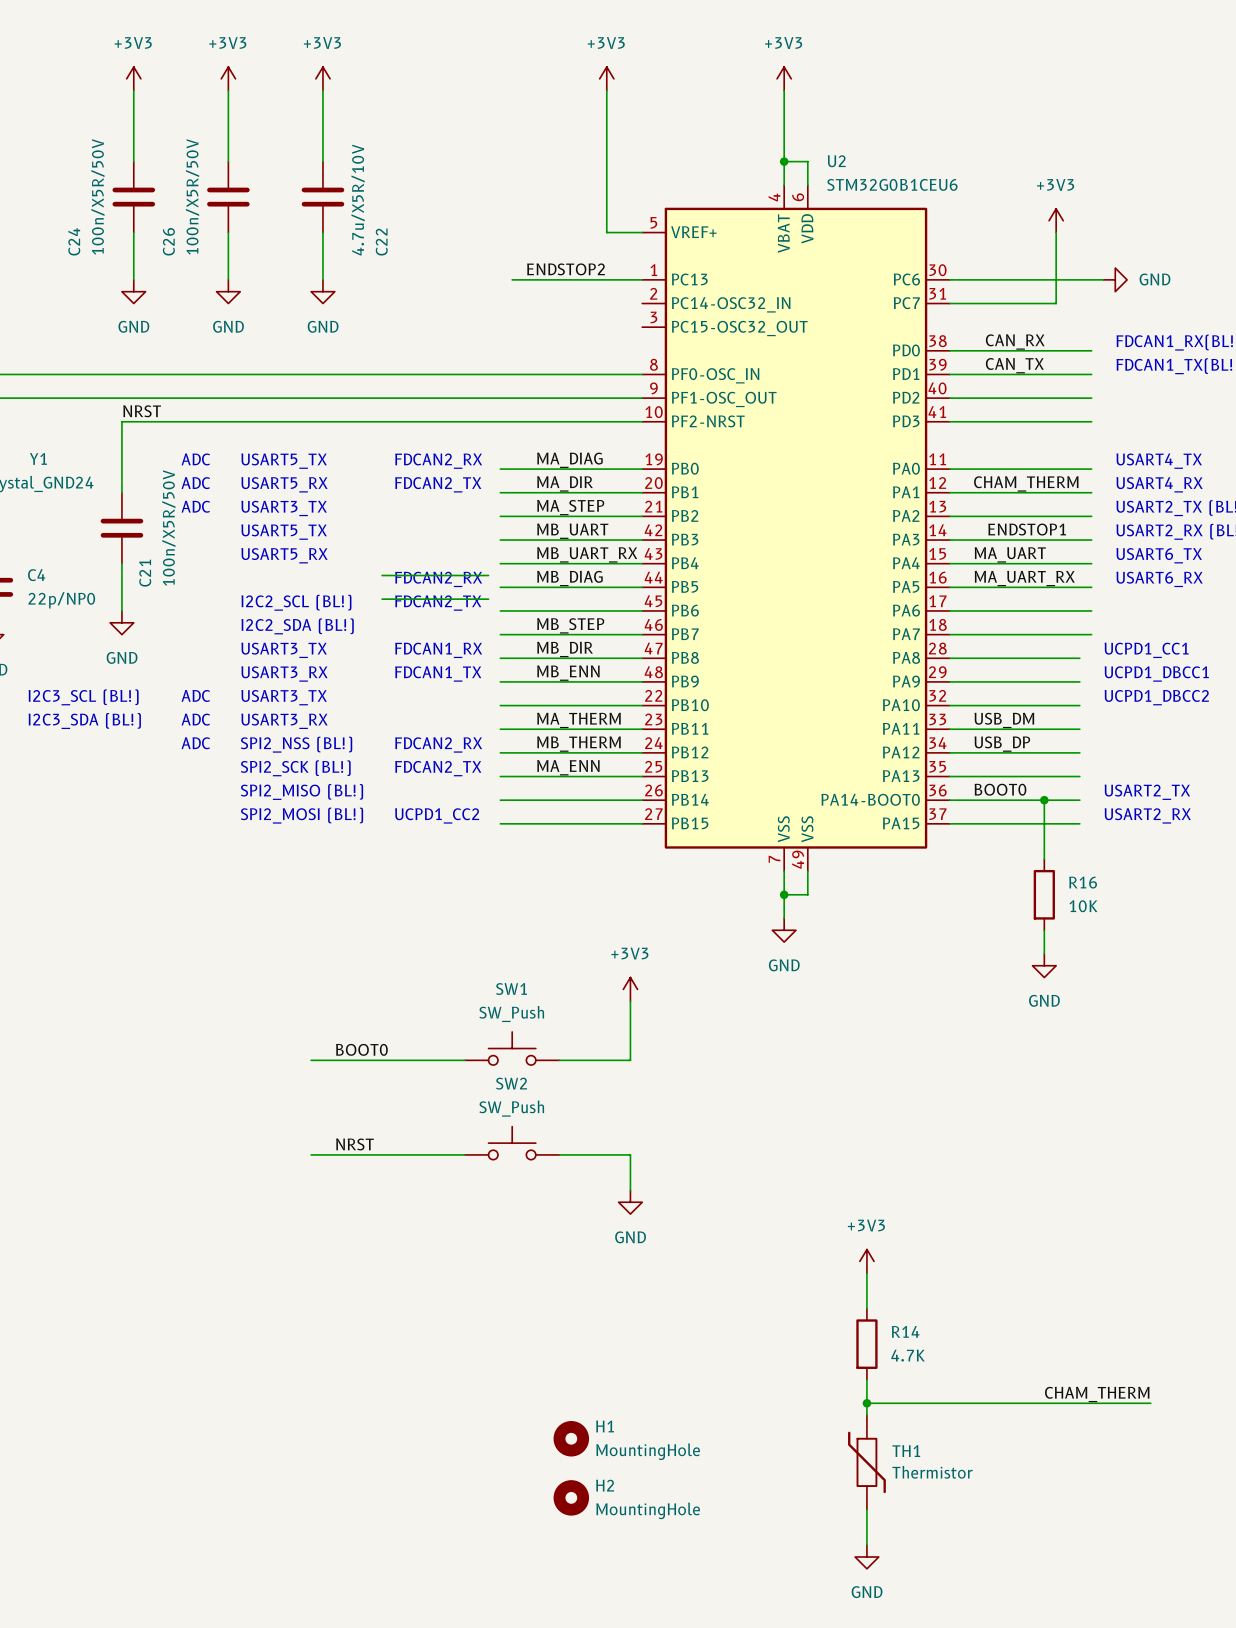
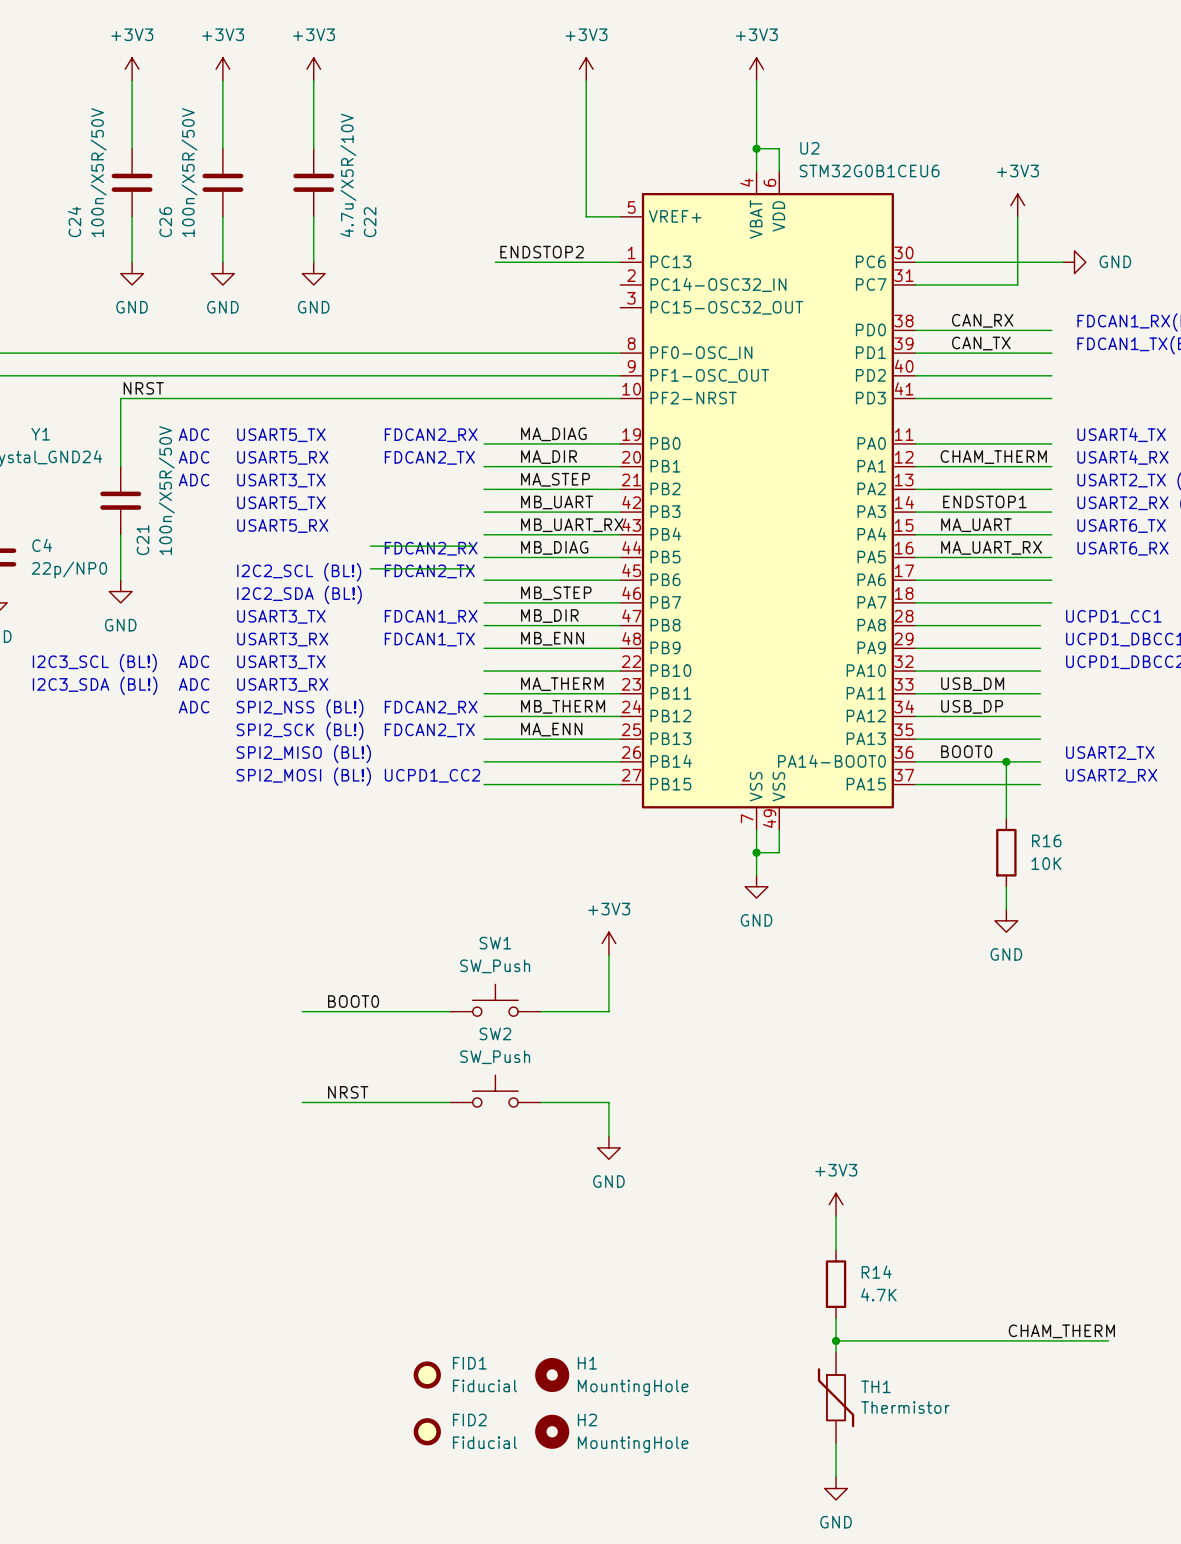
FID1: none -> Fiducial (427, 1375)
FID2: none -> Fiducial (427, 1431)

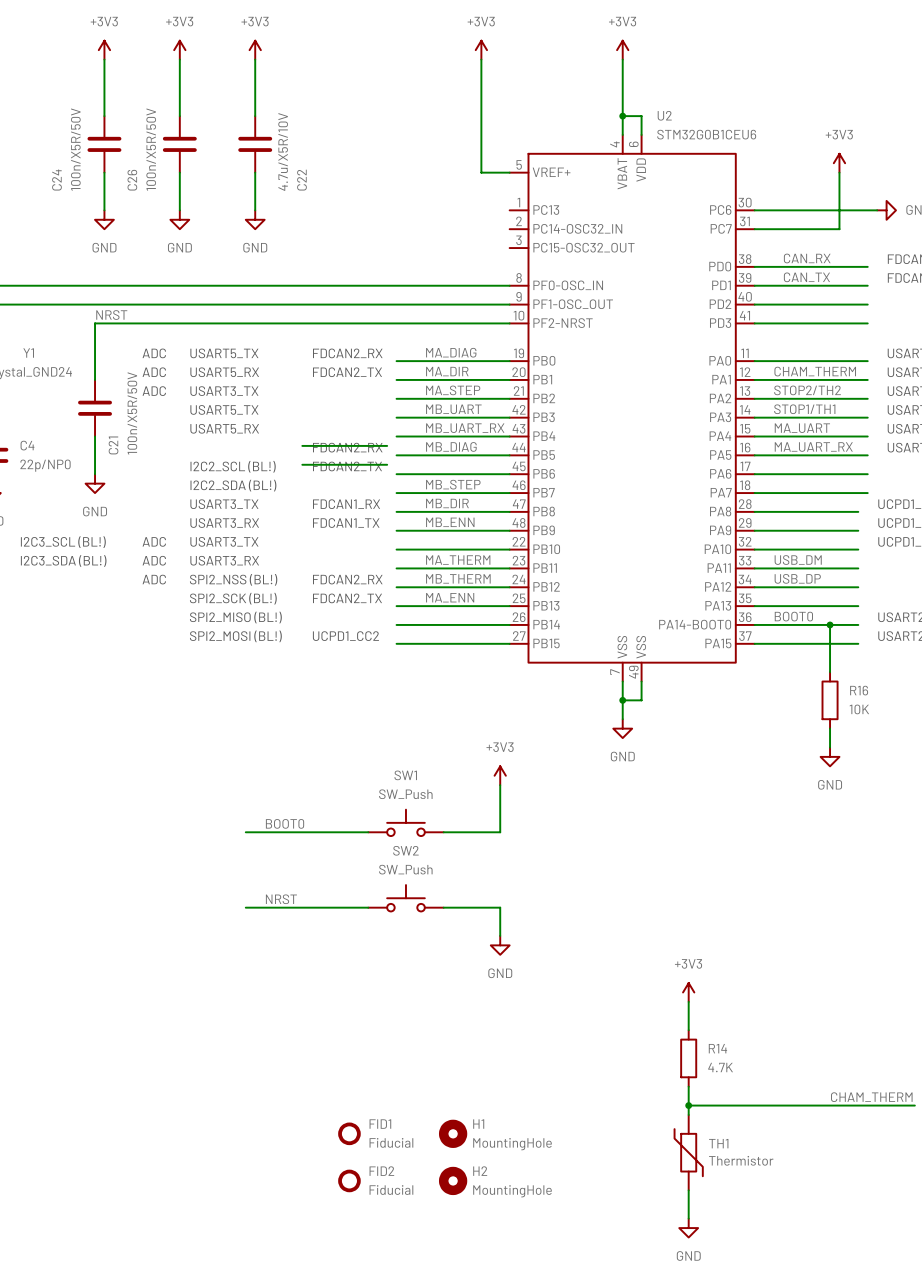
label: ENDSTOP2 (542, 252) -> none
wire: (495, 262) (620, 262) -> none
label: none -> STOP2/TH2 (807, 390)
label: ENDSTOP1 (984, 501) -> none
label: none -> STOP1/TH1 (804, 409)

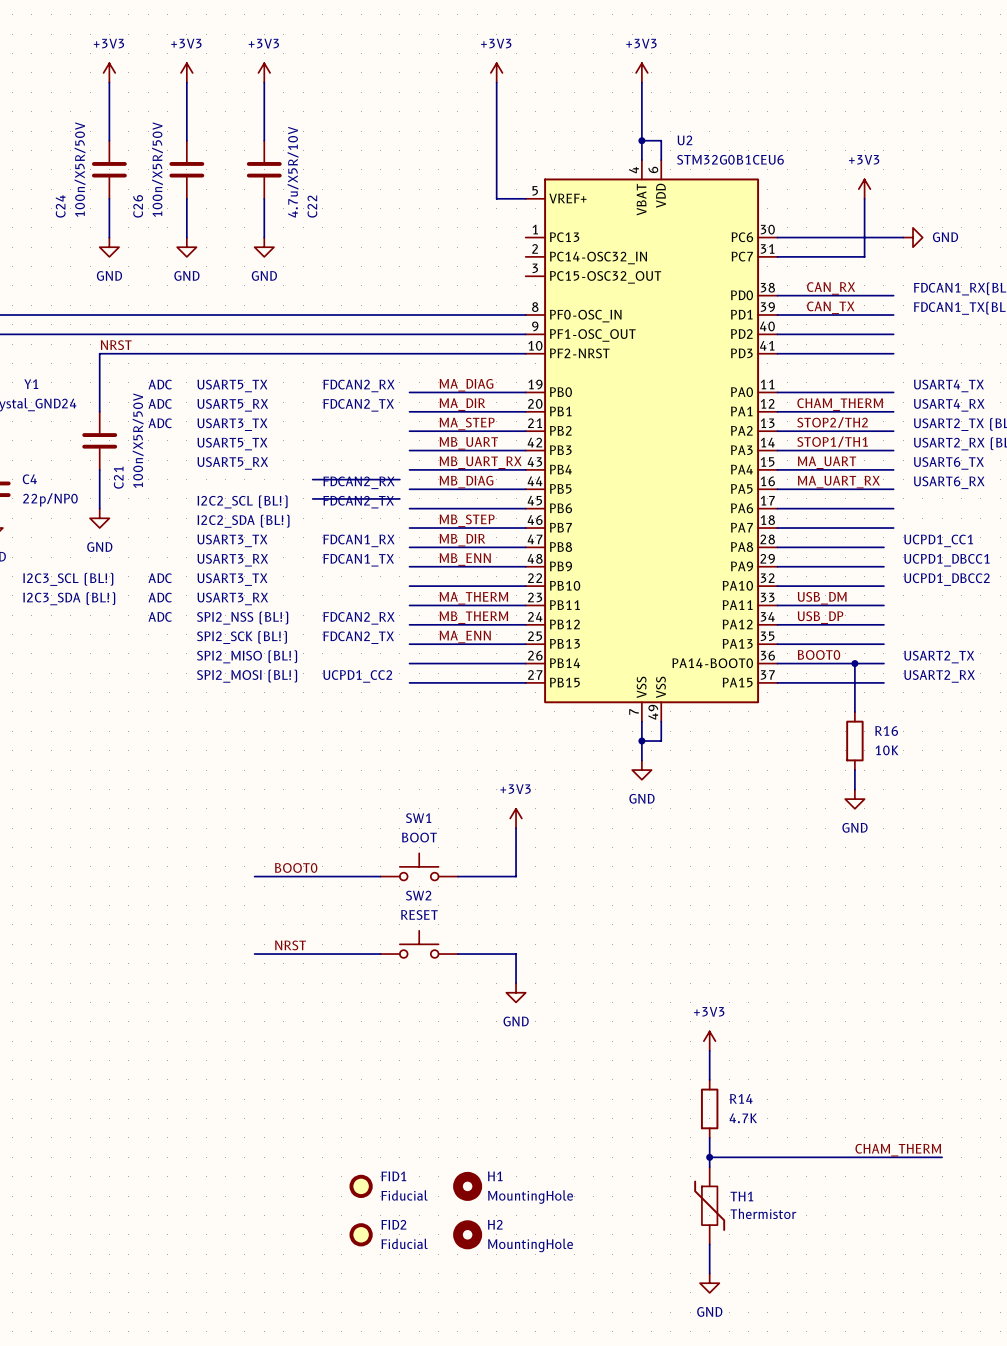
SW1 value: SW_Push (405, 794) -> BOOT (419, 837)
SW2 value: SW_Push (405, 869) -> RESET (419, 914)

